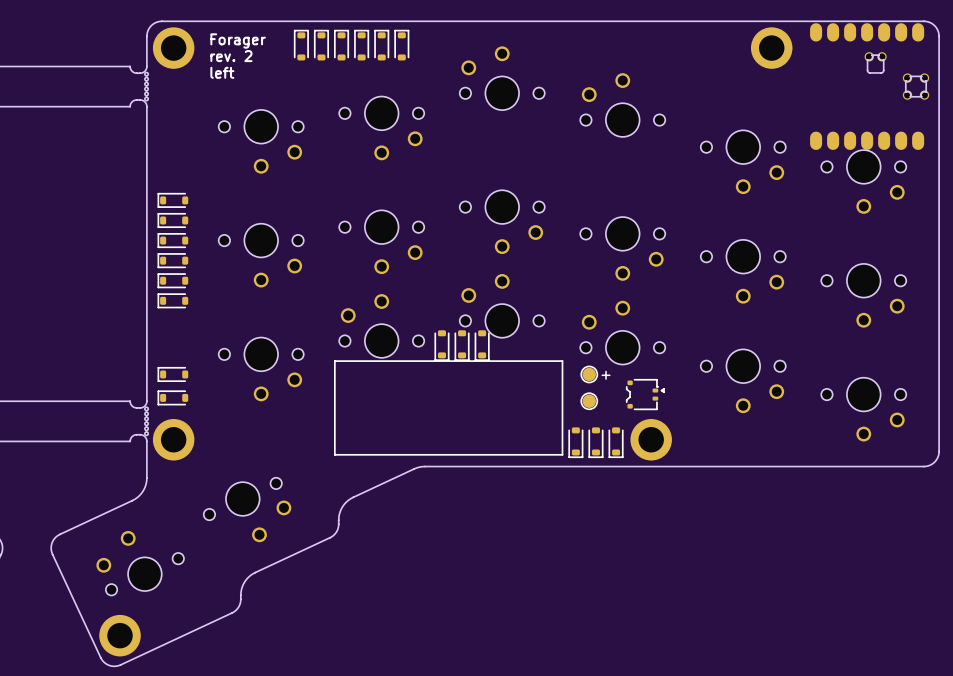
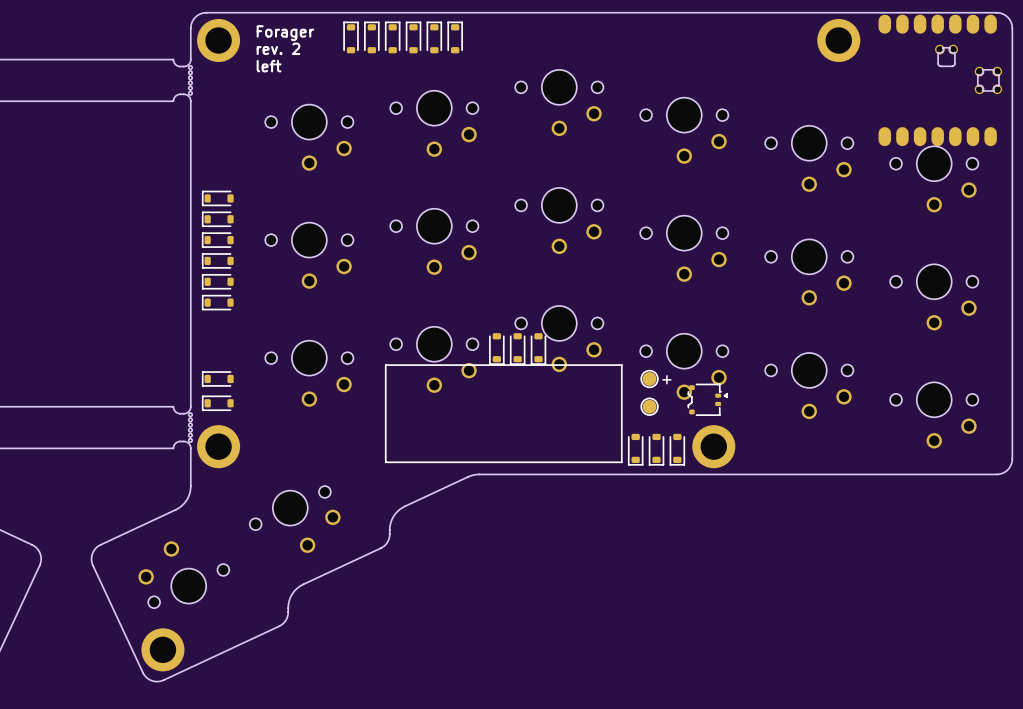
part rotation: 0° (502, 78) -> 180° (559, 102)
part rotation: 0° (622, 105) -> 180° (684, 130)
part rotation: 0° (502, 305) -> 180° (559, 339)
part rotation: 0° (381, 325) -> 180° (434, 359)
part rotation: 0° (622, 332) -> 180° (684, 366)

